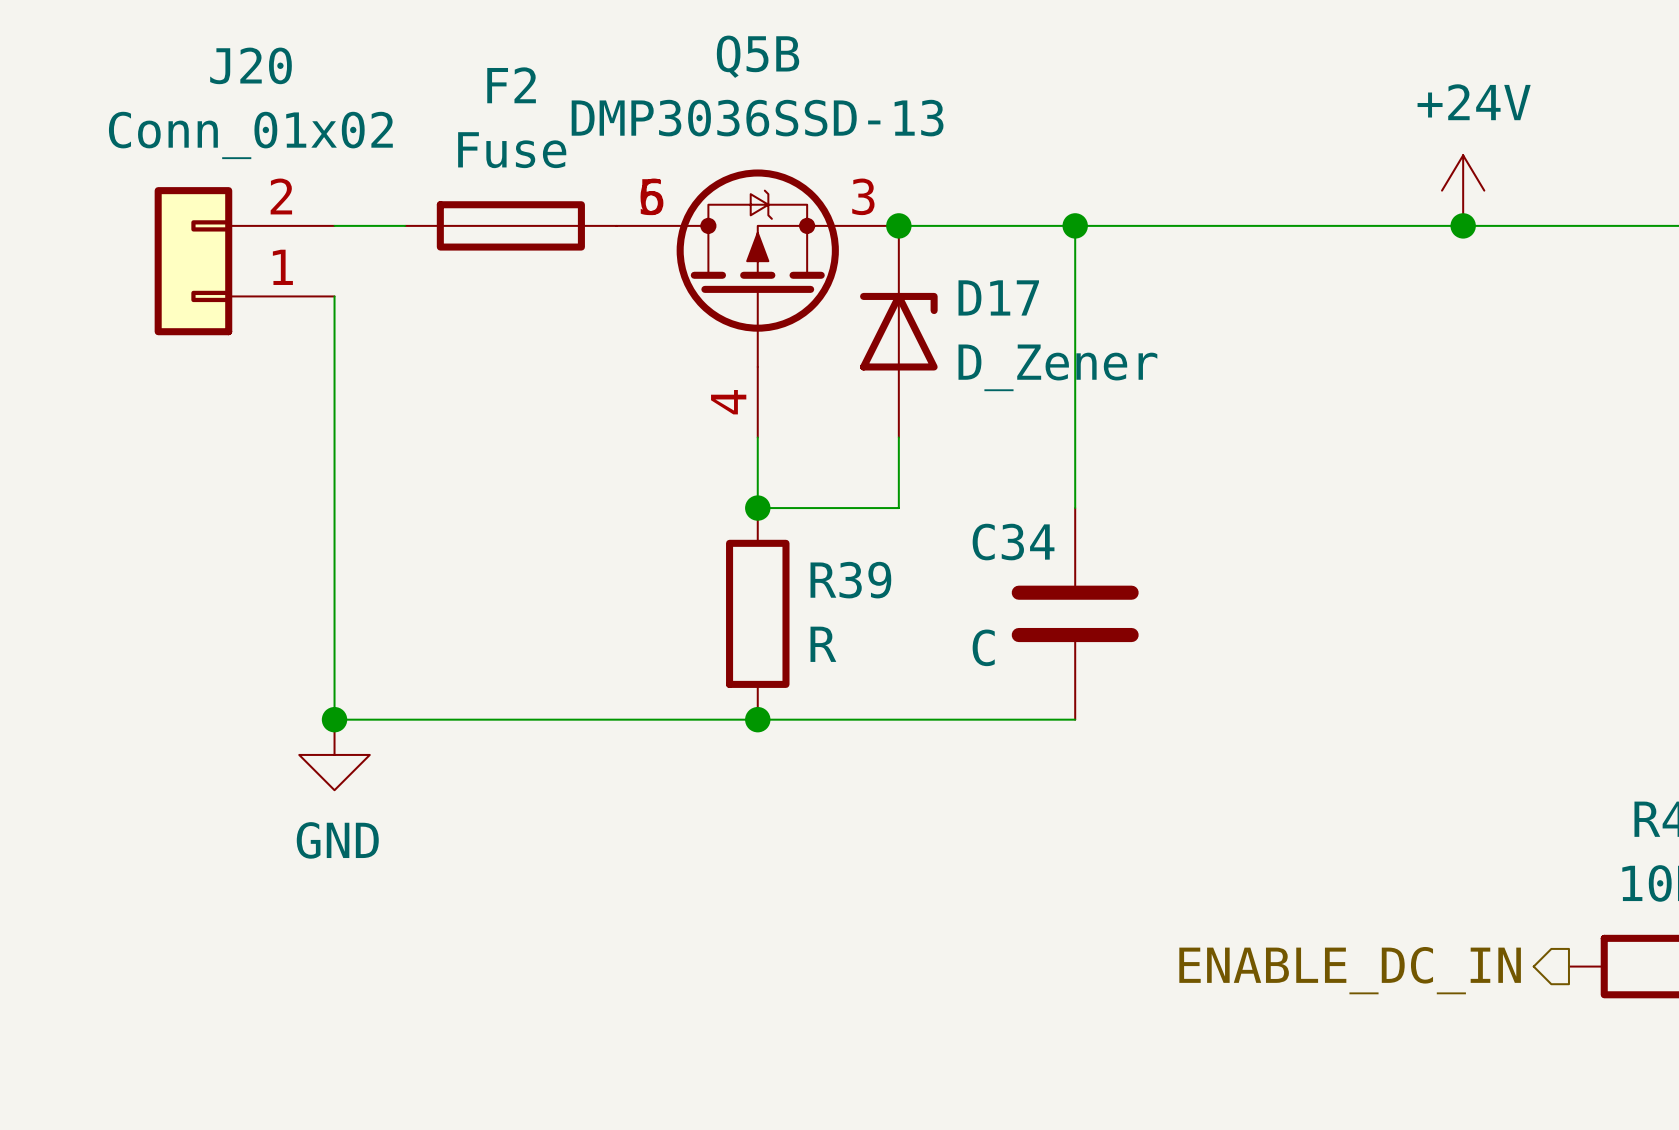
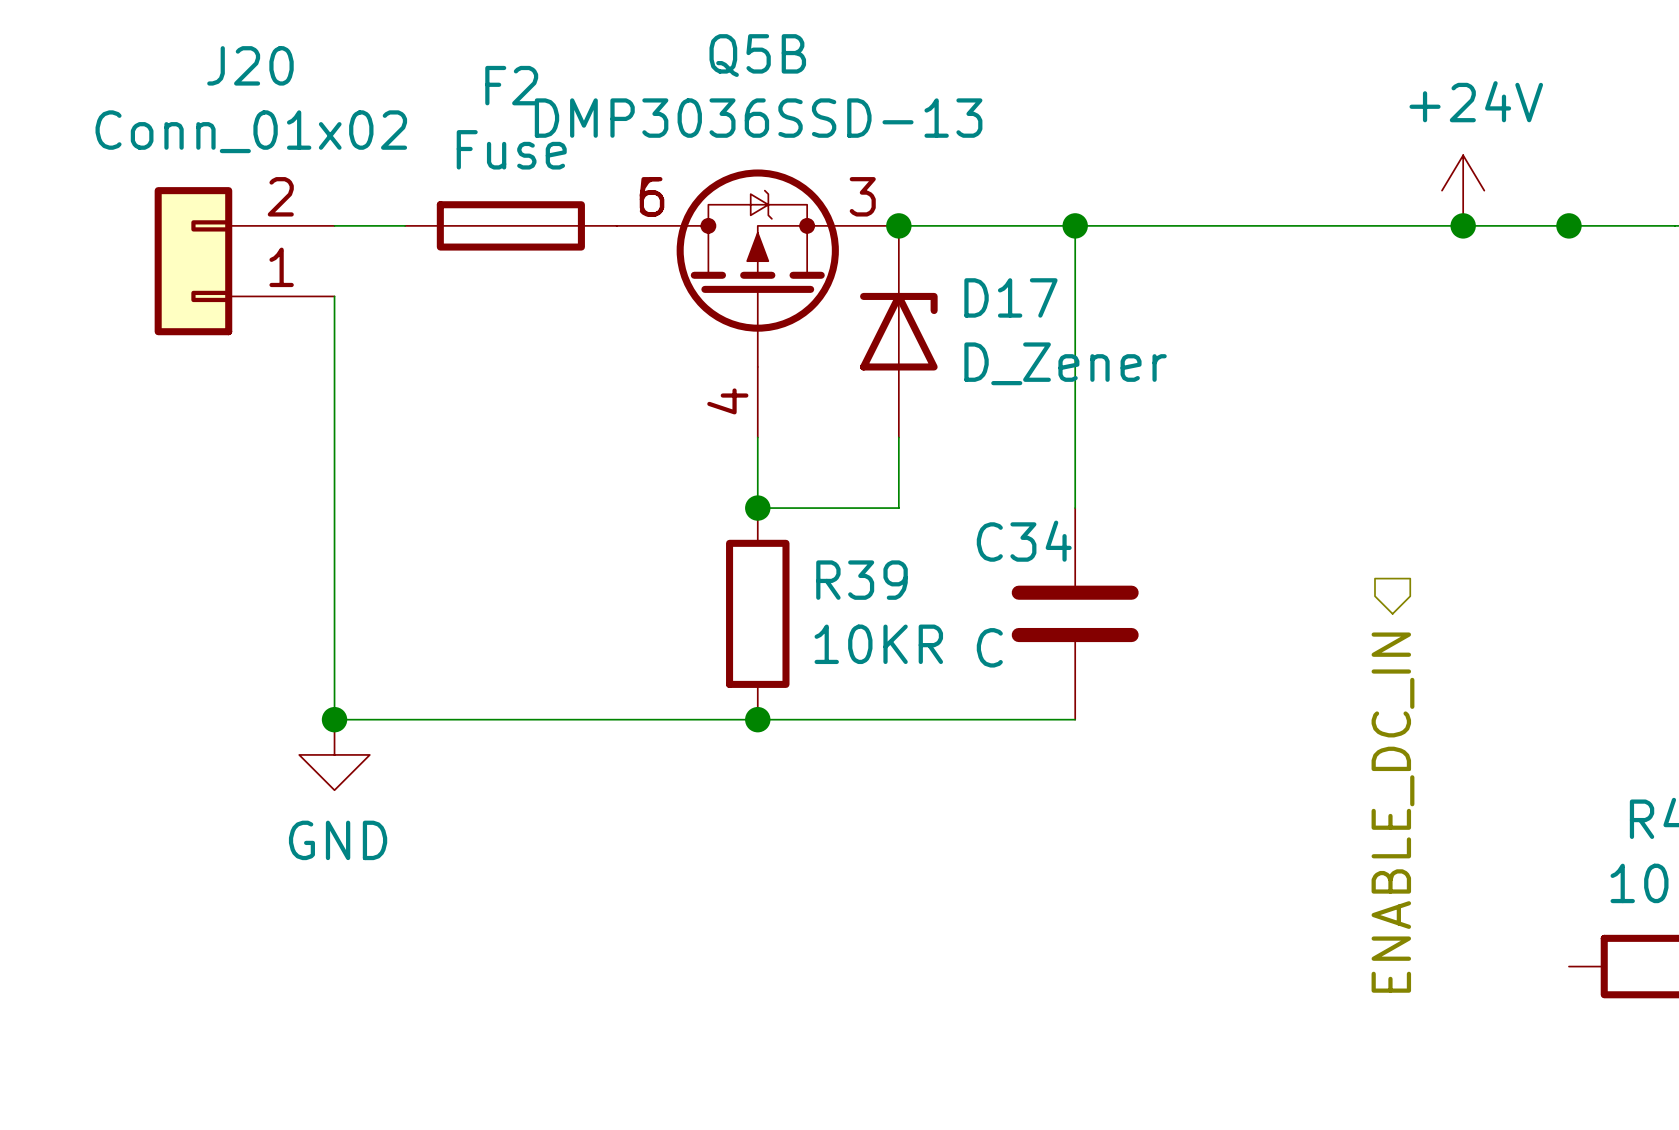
junction: none -> (1568, 225)
R39 value: R (823, 644) -> 10KR (878, 644)
hierarchical label rotation: 0° (1350, 970) -> 90° counterclockwise (1392, 812)

